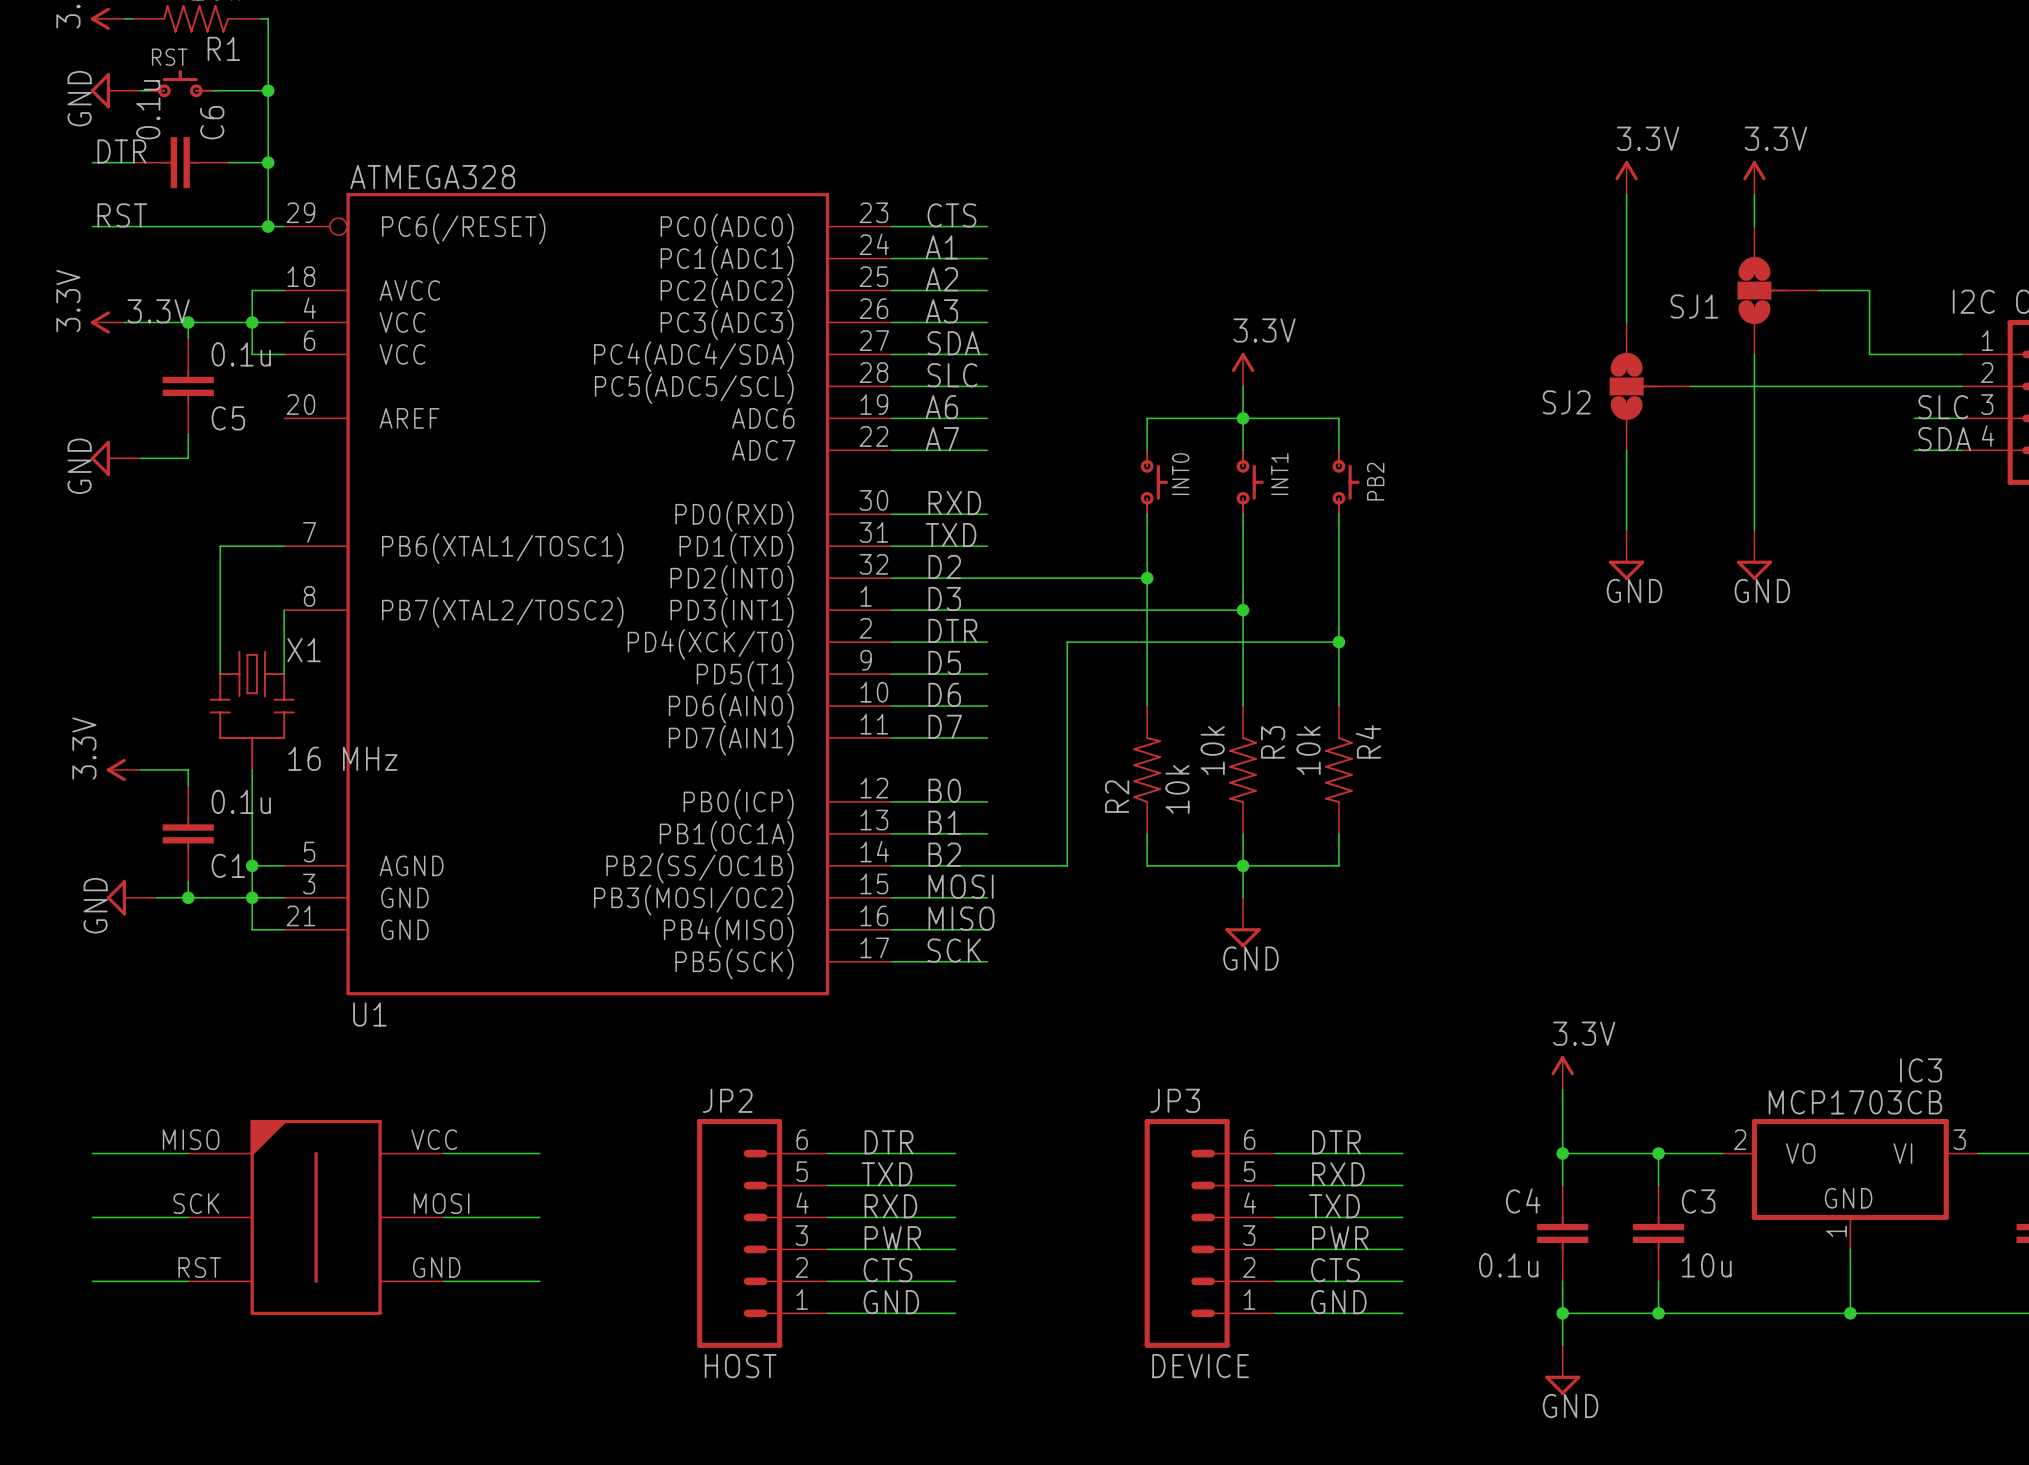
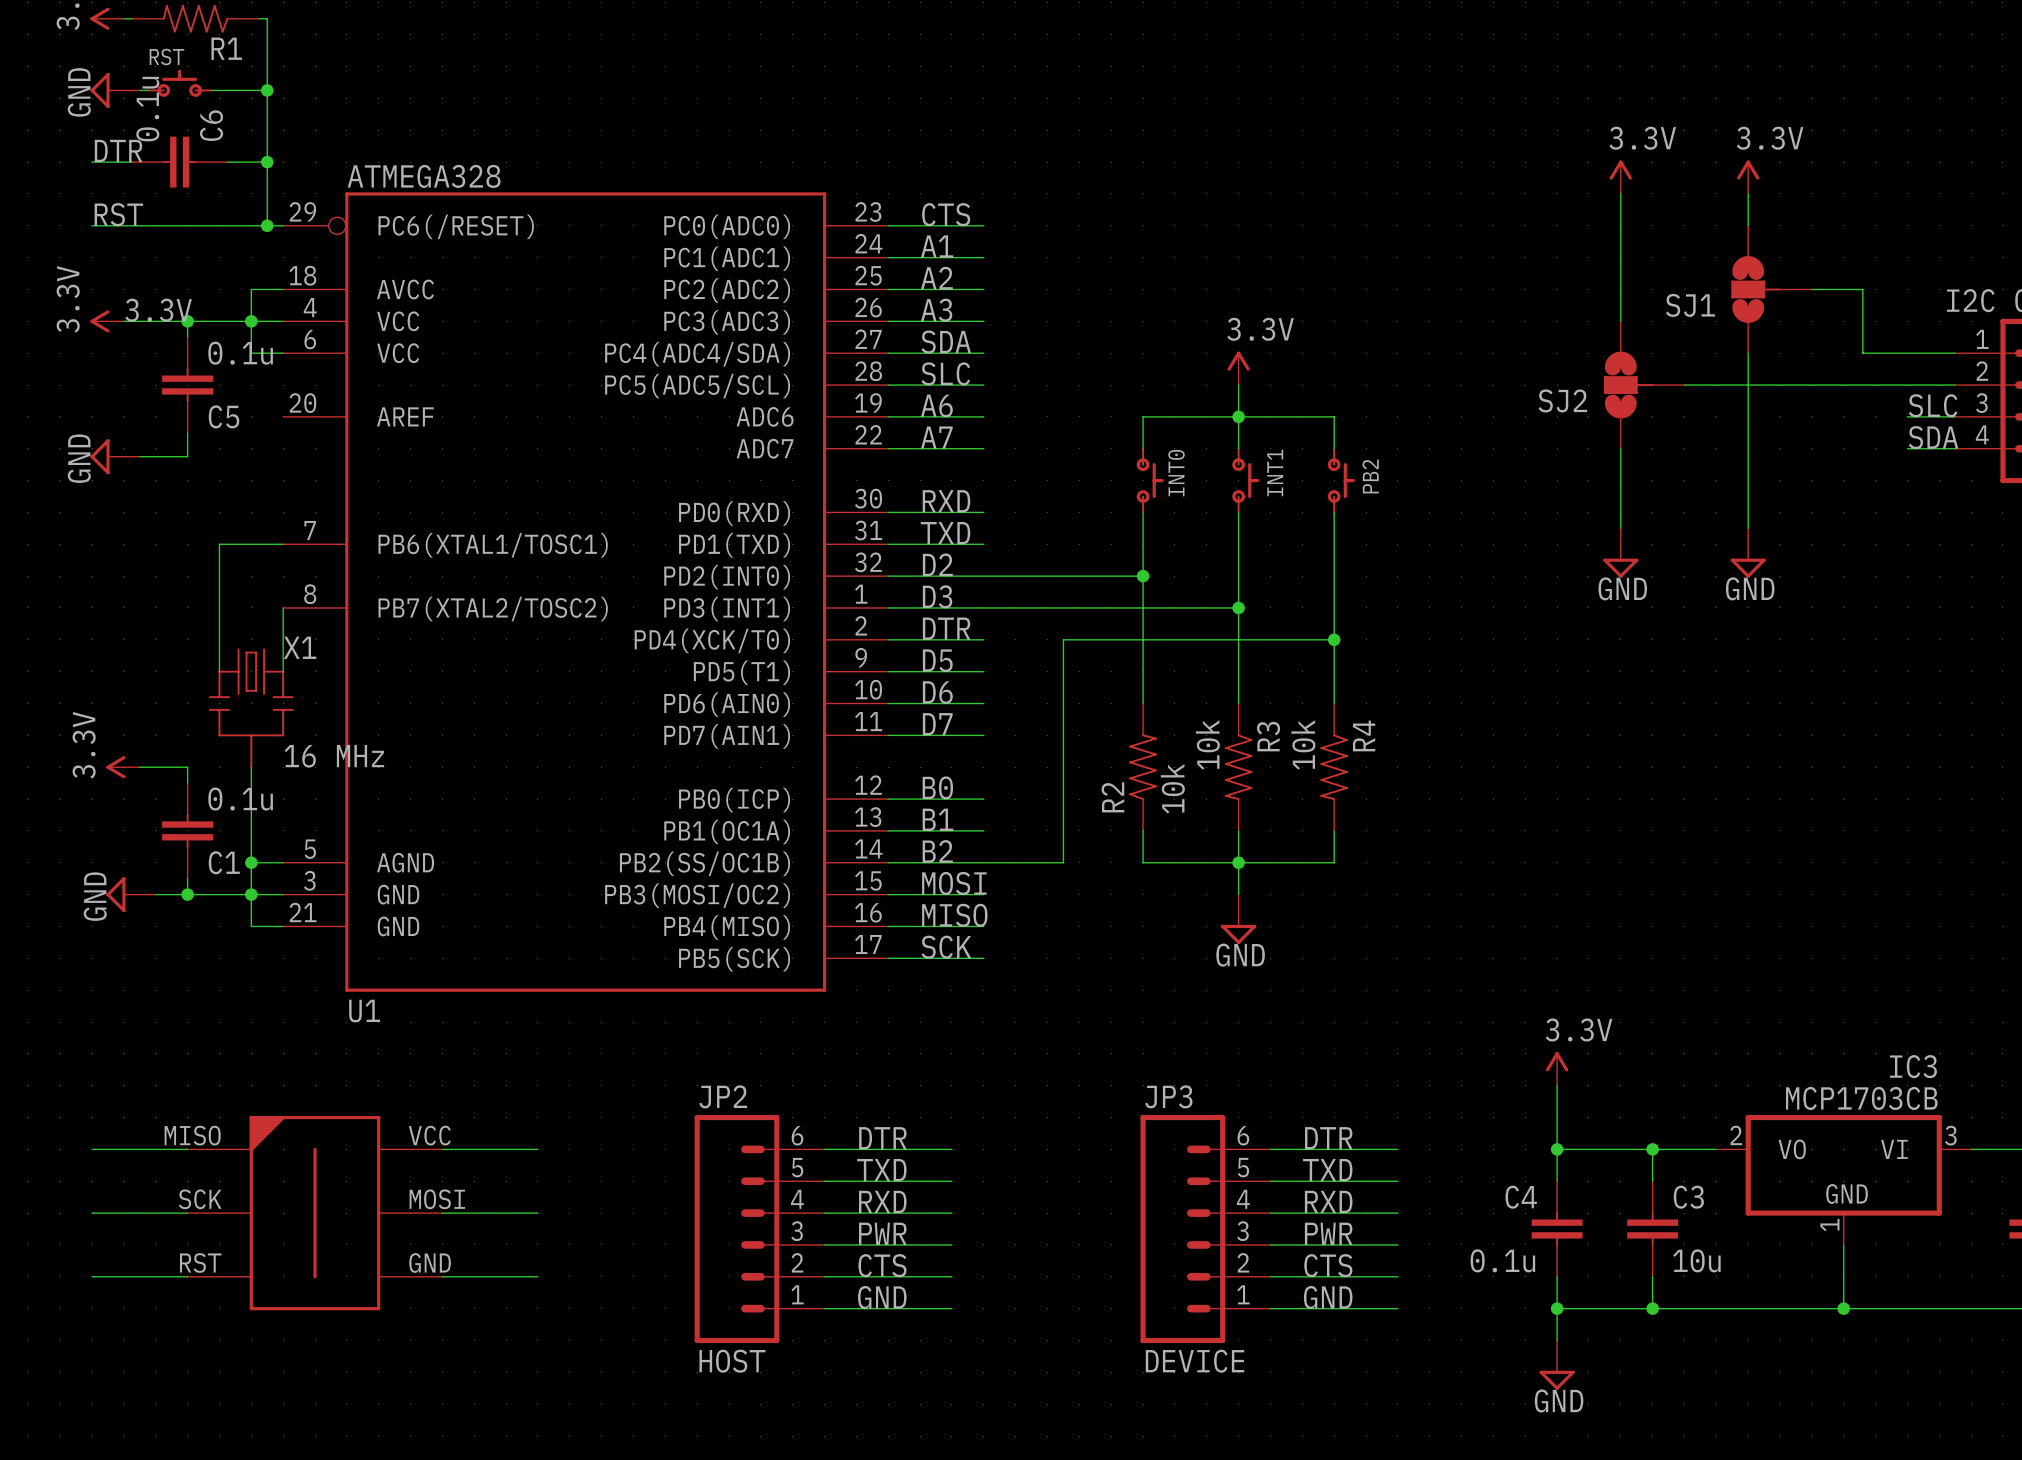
label: RXD (1338, 1174) -> TXD (1327, 1170)
label: TXD (1334, 1206) -> RXD (1328, 1201)

